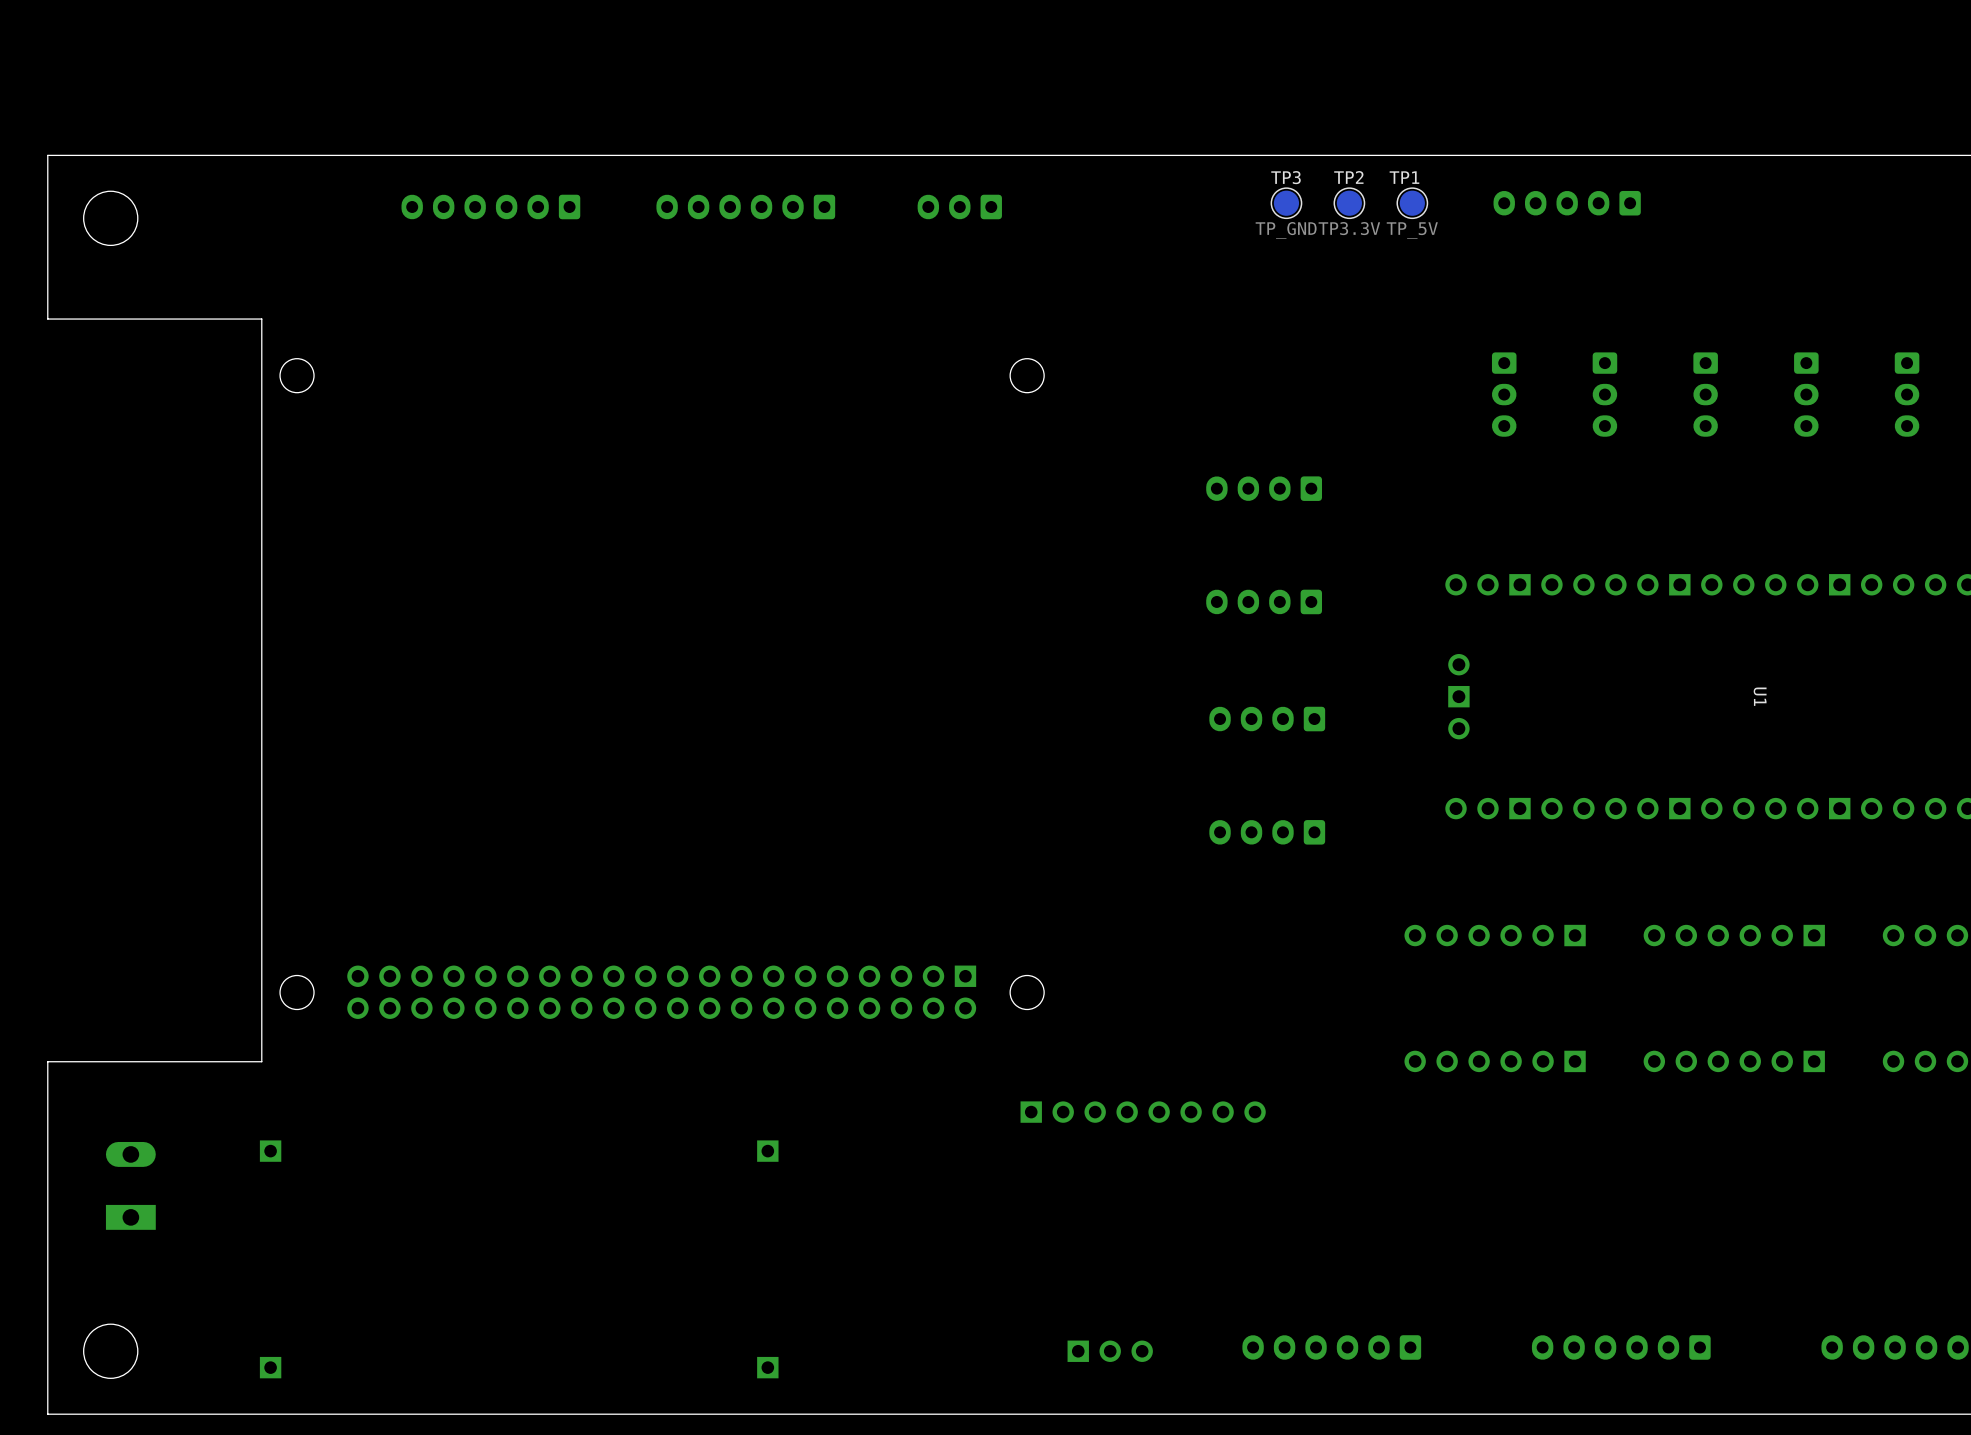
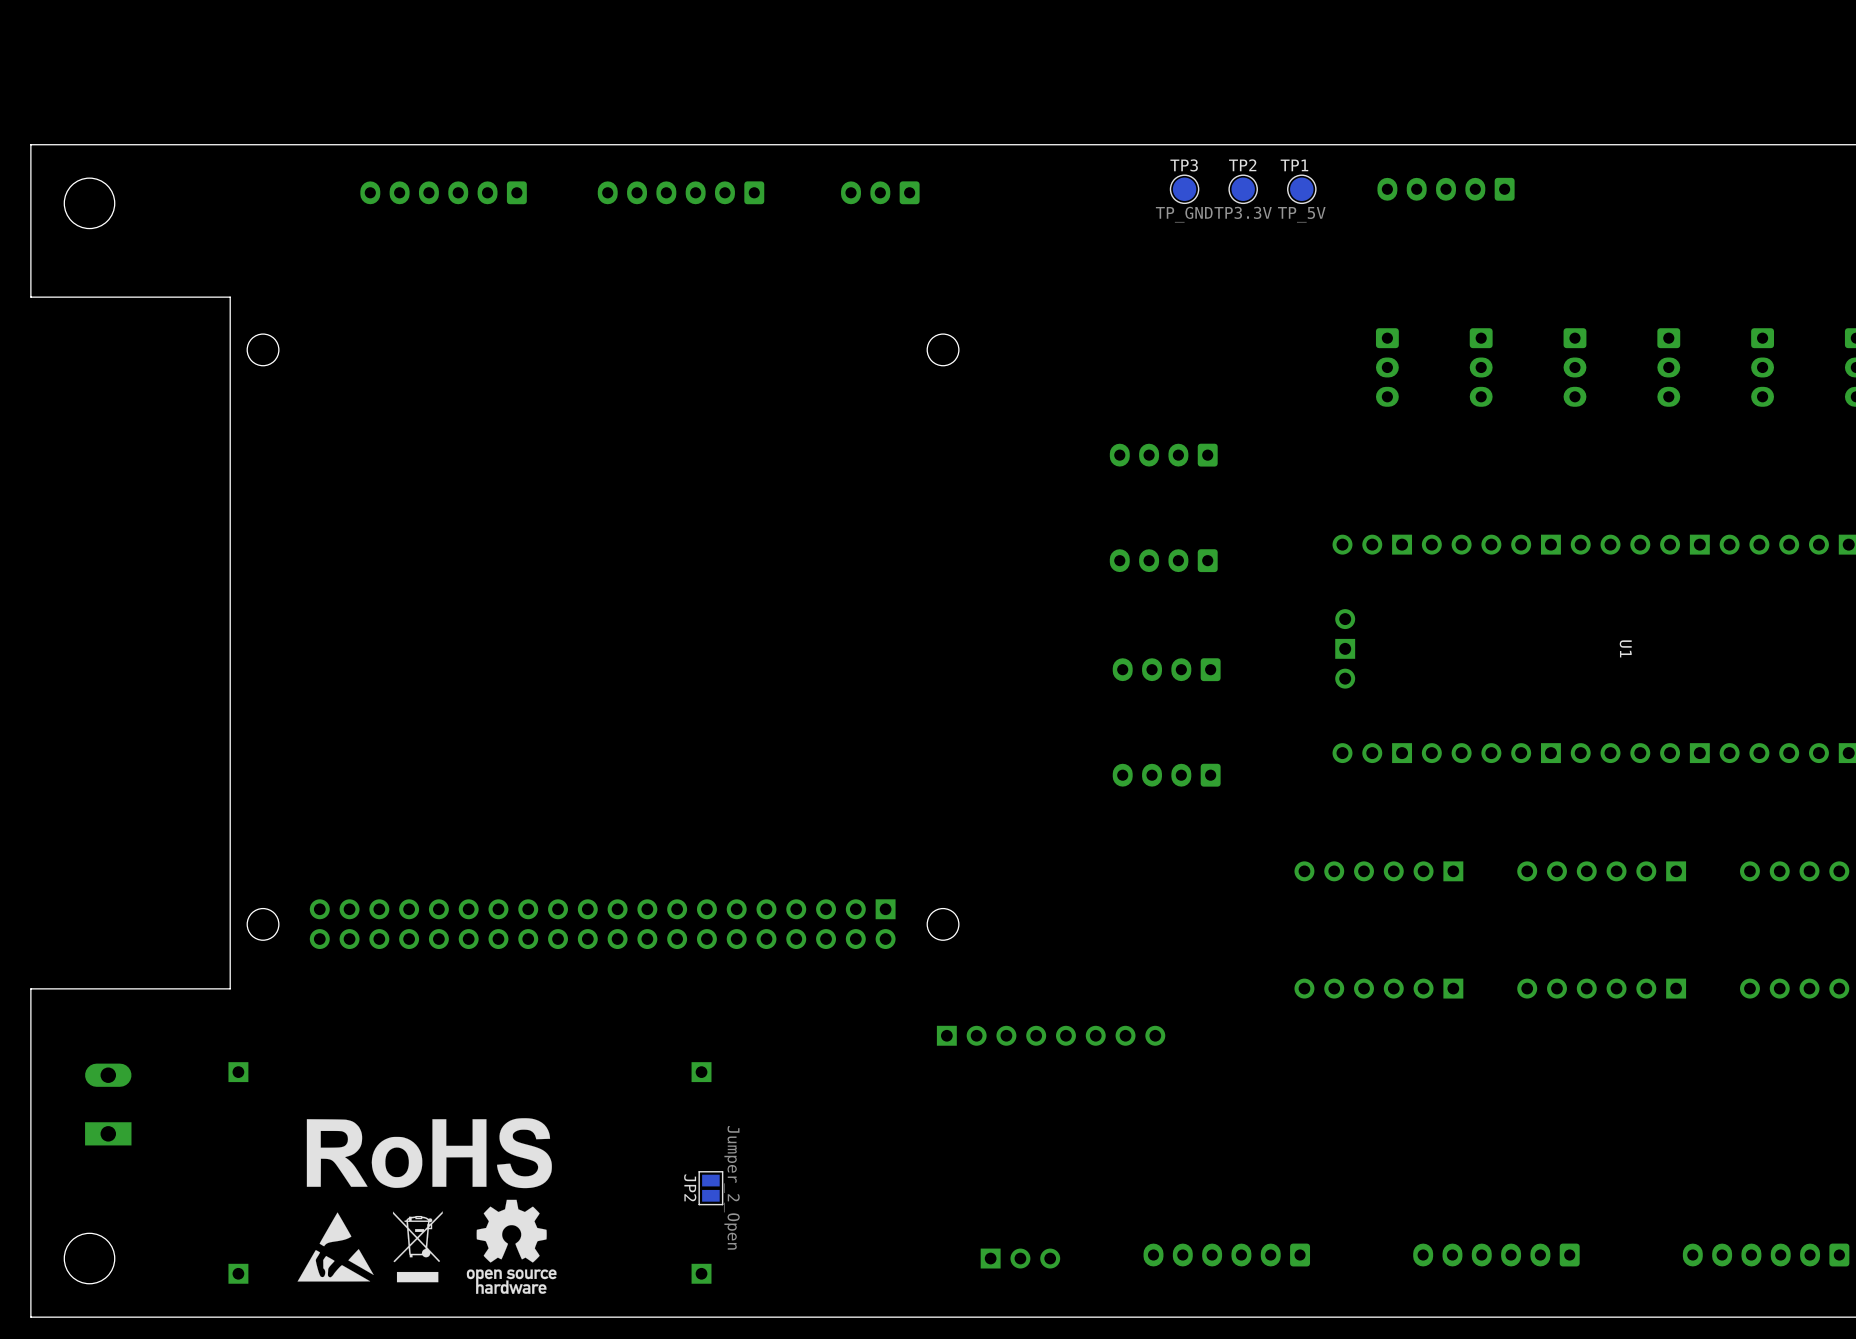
drawing: none -> [306, 1118, 557, 1294]
JP2: none -> Jumper_2_Open (710, 1188)
drawing: none -> [392, 1211, 443, 1283]
drawing: none -> [297, 1212, 374, 1282]

